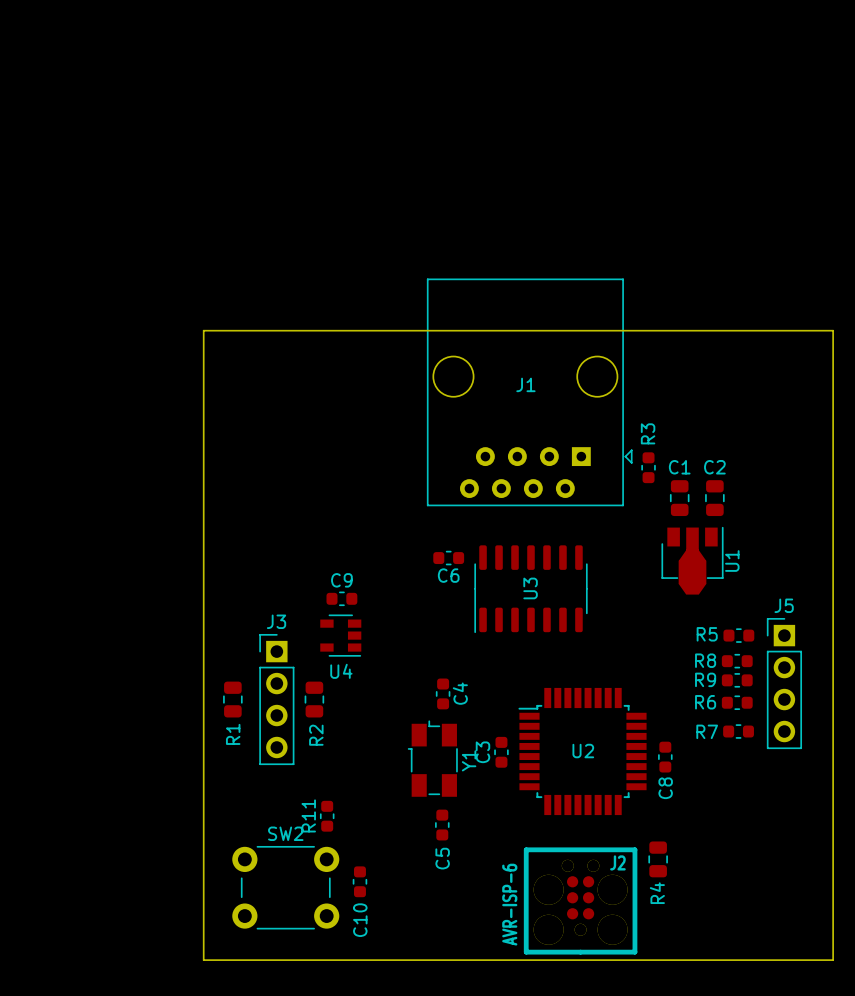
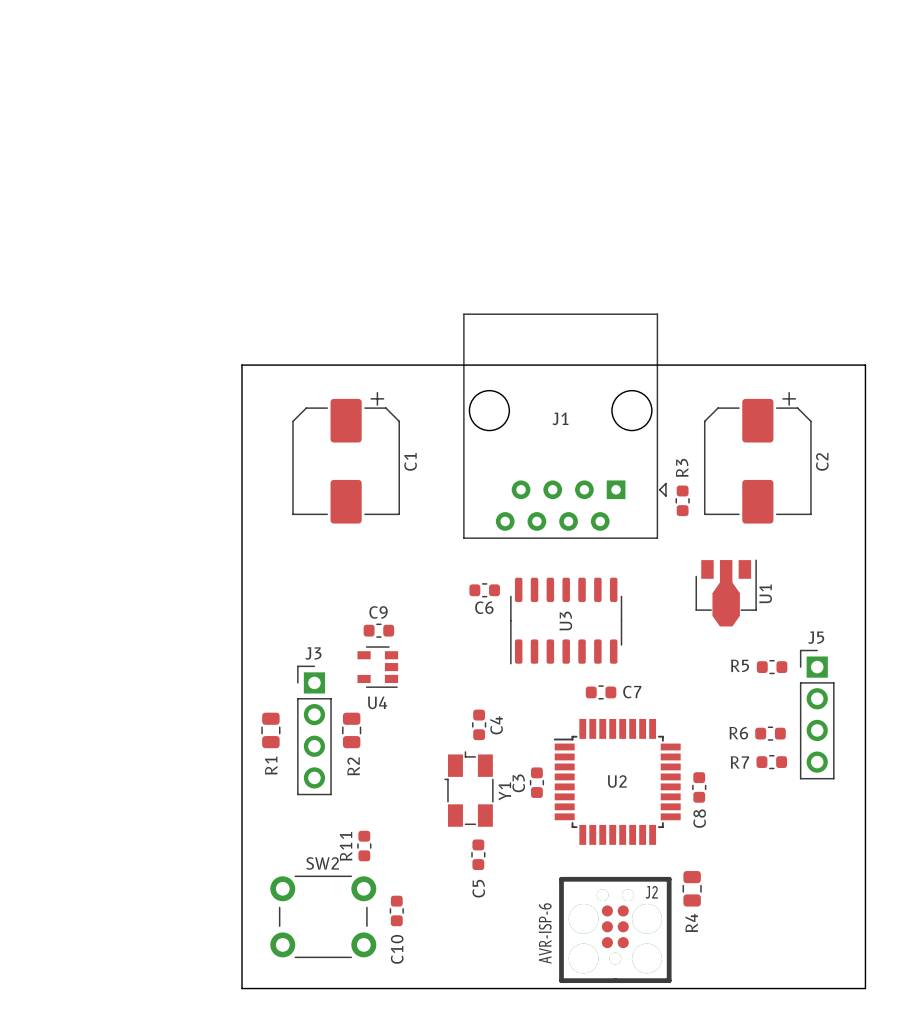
C1 name position: C1 (679, 467) -> C1 (410, 461)
C2 name position: C2 (714, 467) -> C2 (822, 461)
C1 footprint: [670, 480, 690, 517] -> [292, 391, 400, 524]
C2 footprint: [705, 480, 725, 517] -> [703, 391, 812, 524]
C7: none -> (601, 692)
R8: (737, 661) -> none
R9: (737, 680) -> none

